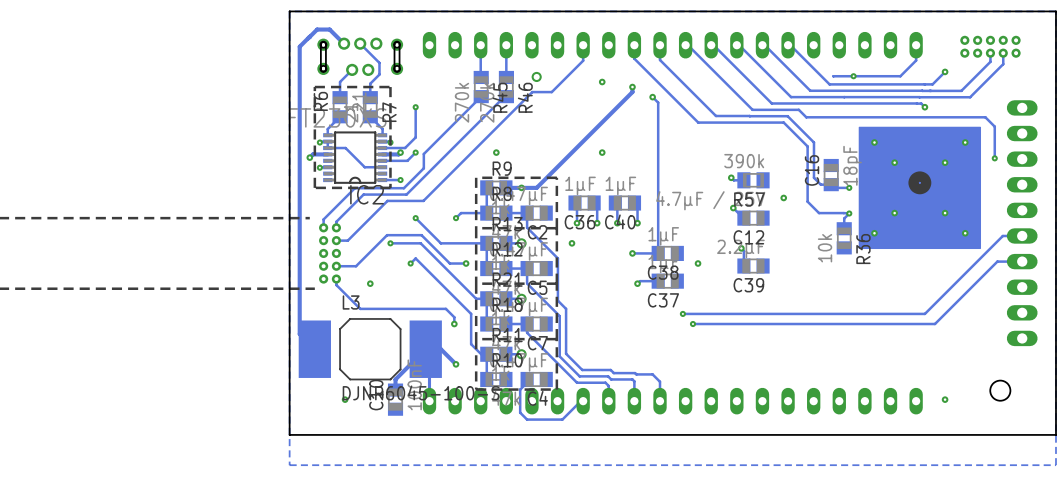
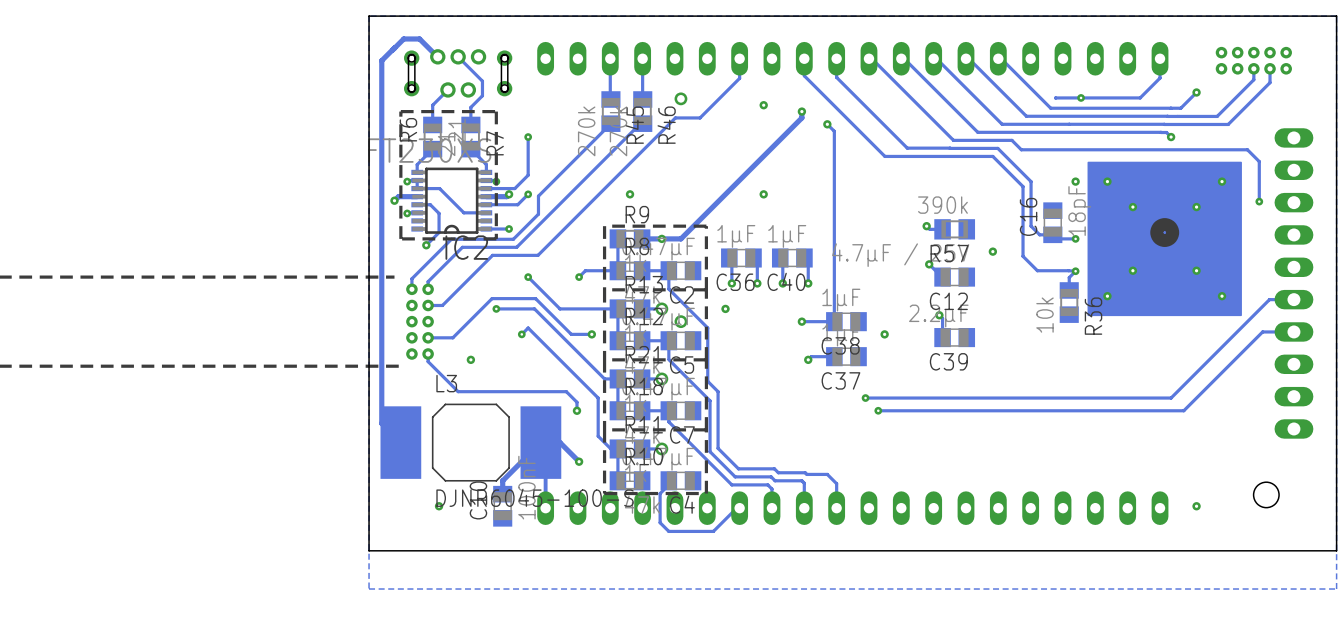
via: none -> (1075, 181)
track: none -> (417, 204) (430, 204) (439, 213) (439, 232) (426, 245)
via: none -> (426, 245)
via: none -> (680, 321)

